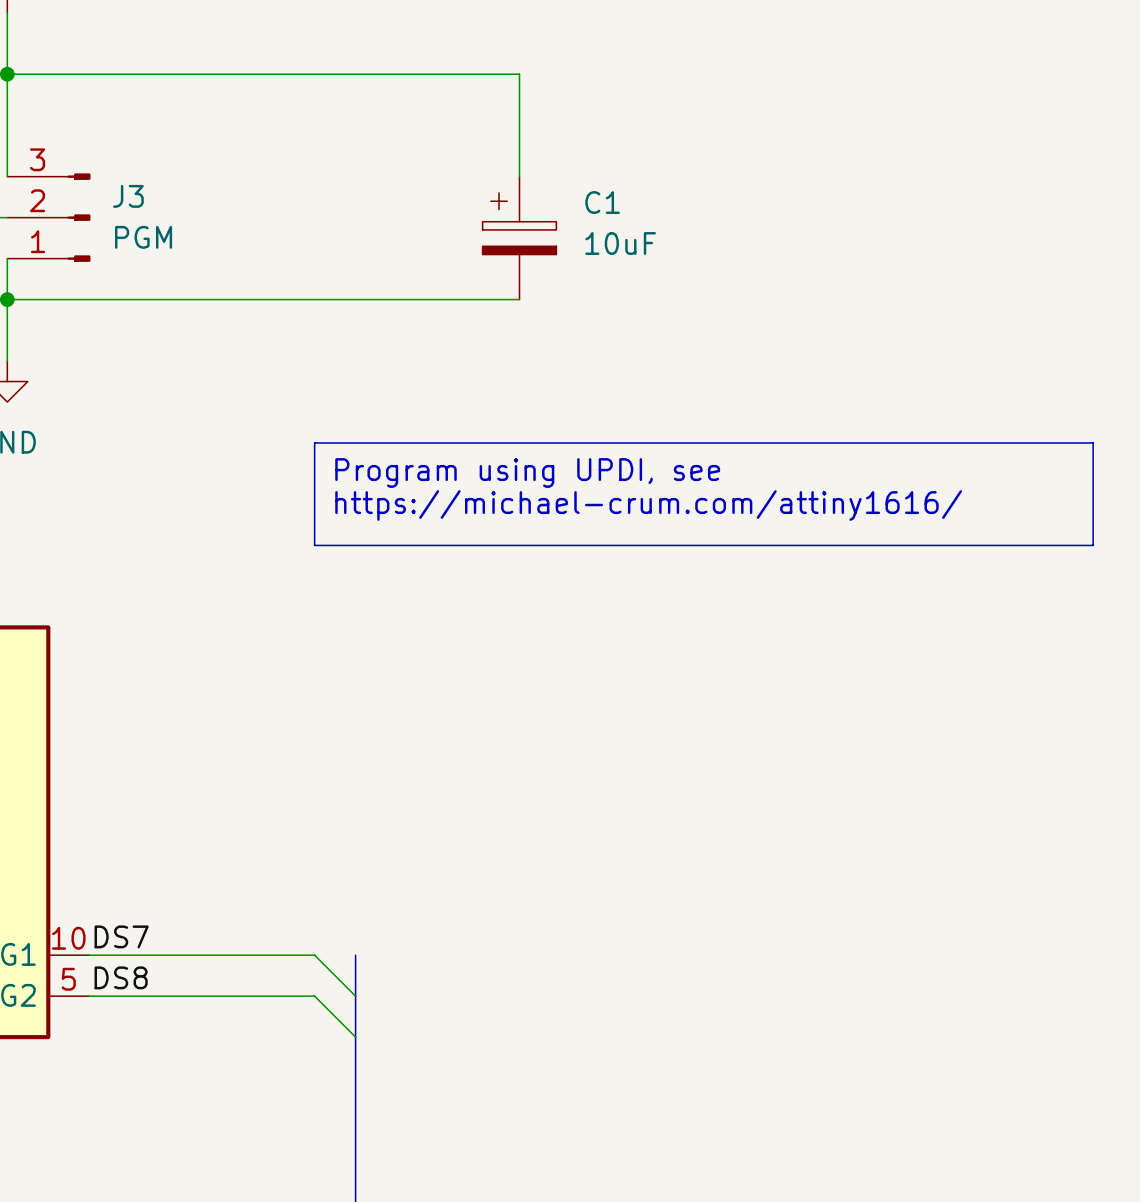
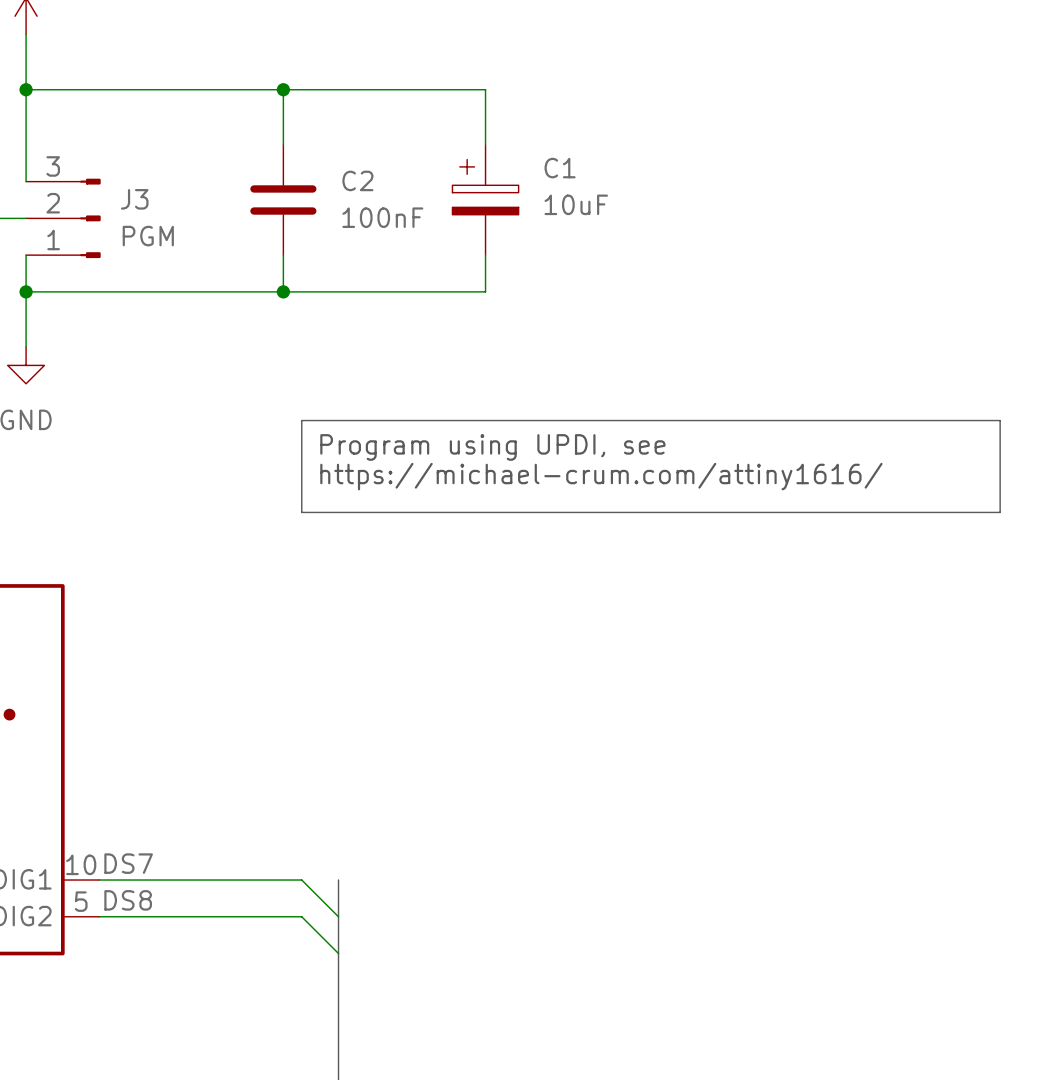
wire: none -> (283, 89) (283, 144)
junction: none -> (283, 89)
C2: none -> 100nF (283, 200)
C1 position: (519, 238) -> (485, 200)
wire: none -> (283, 255) (283, 291)
junction: none -> (283, 291)

